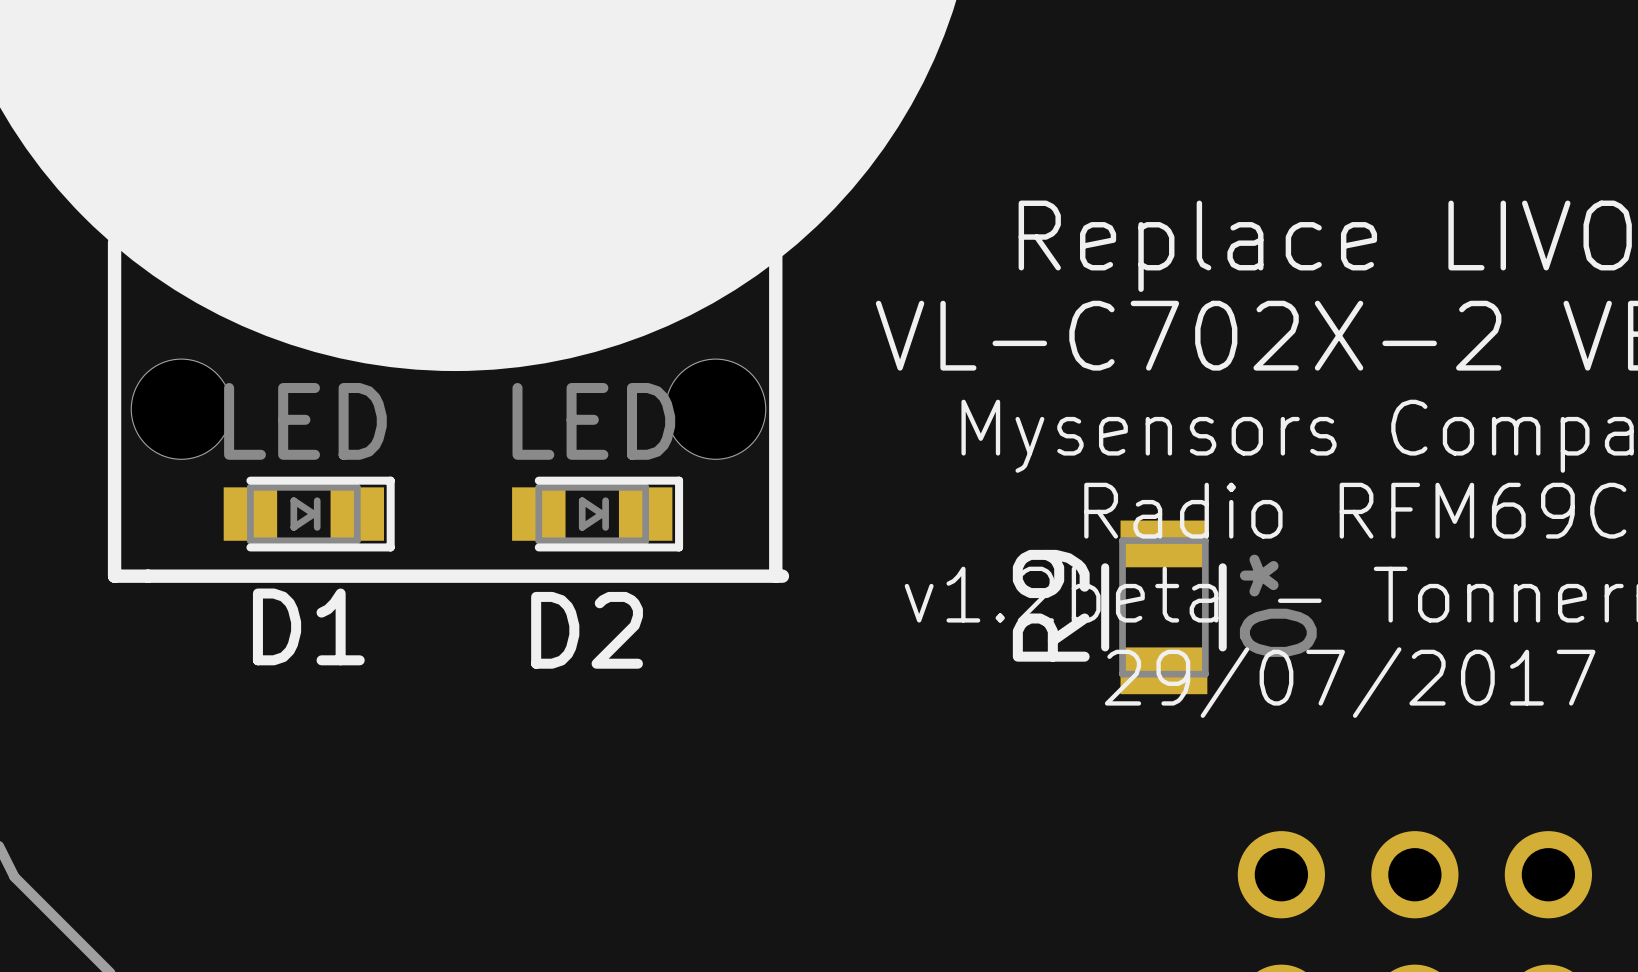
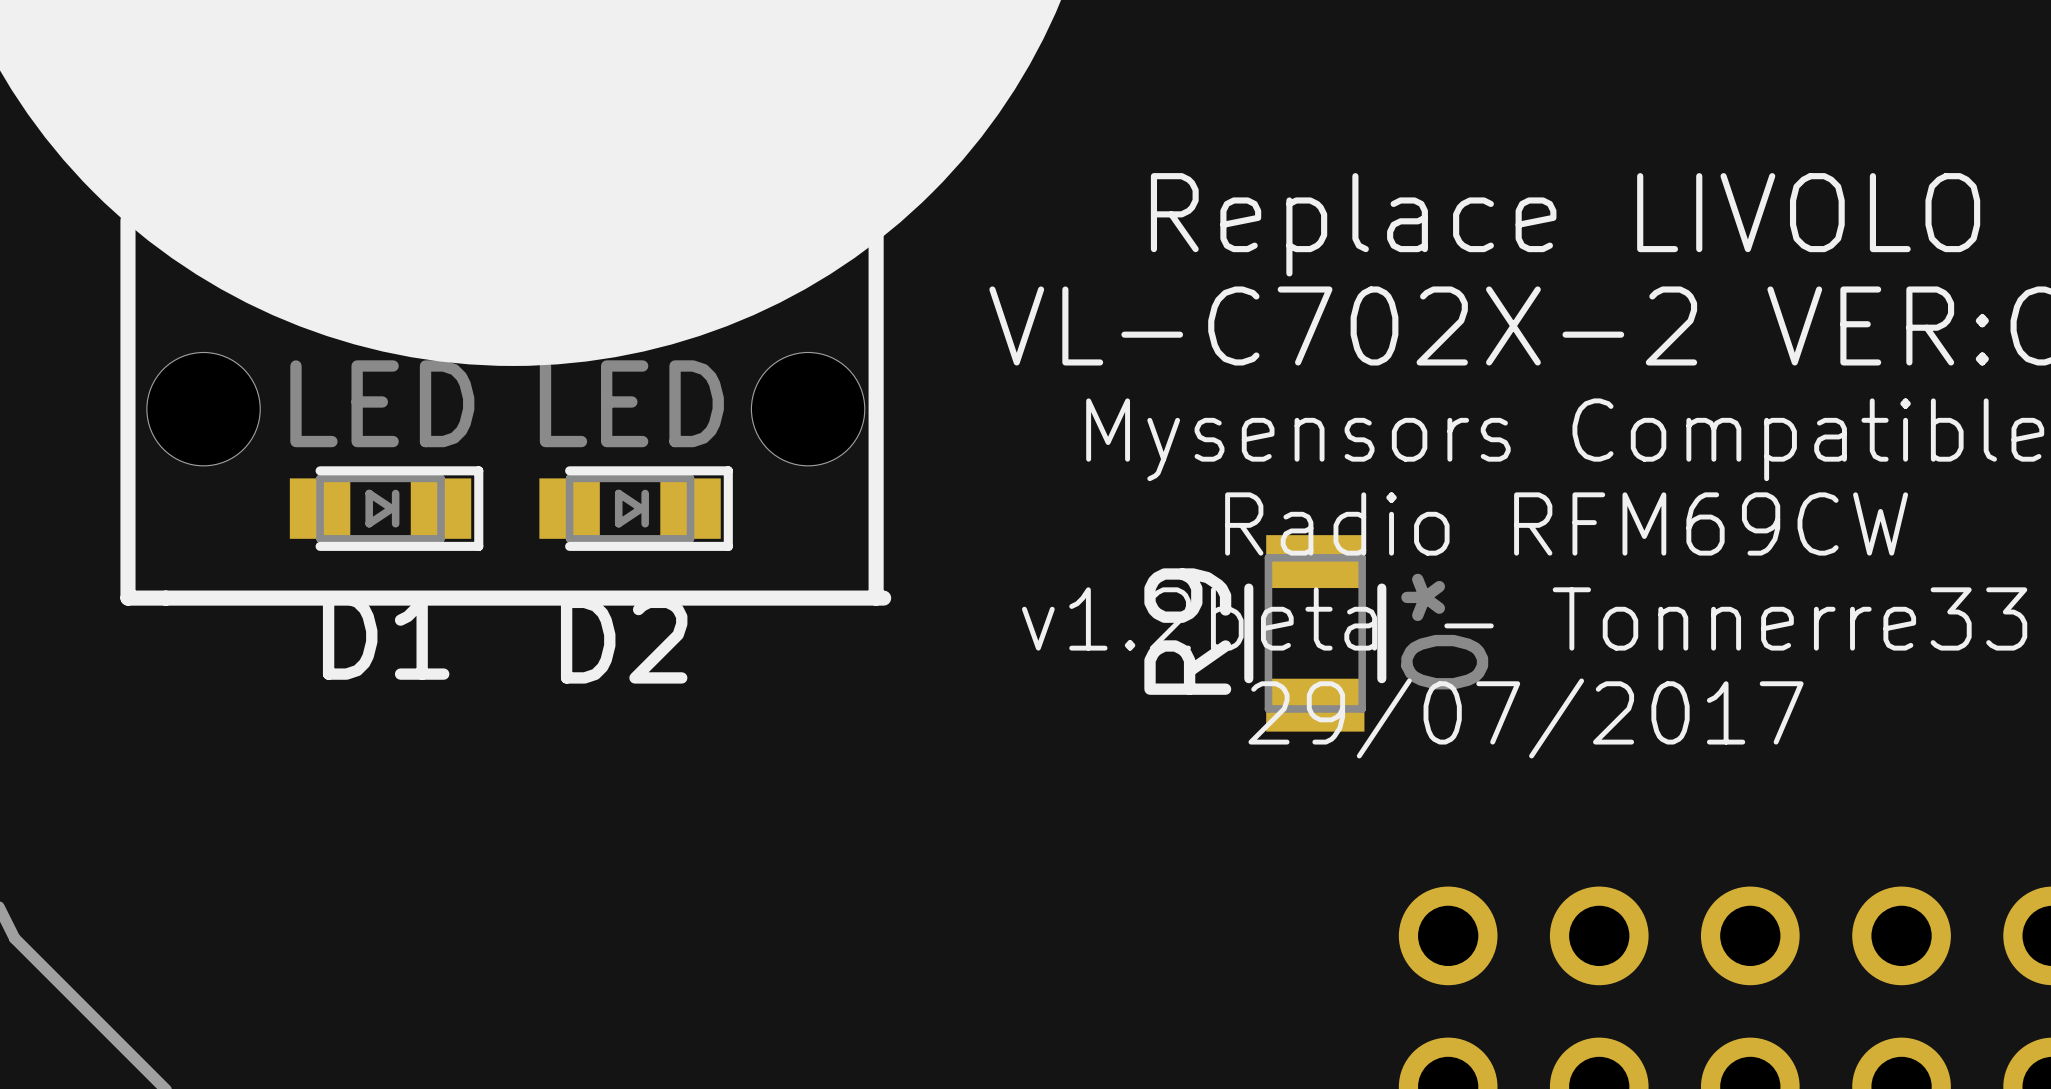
D1 position: (309, 514) -> (386, 508)
D2 position: (597, 514) -> (636, 508)

